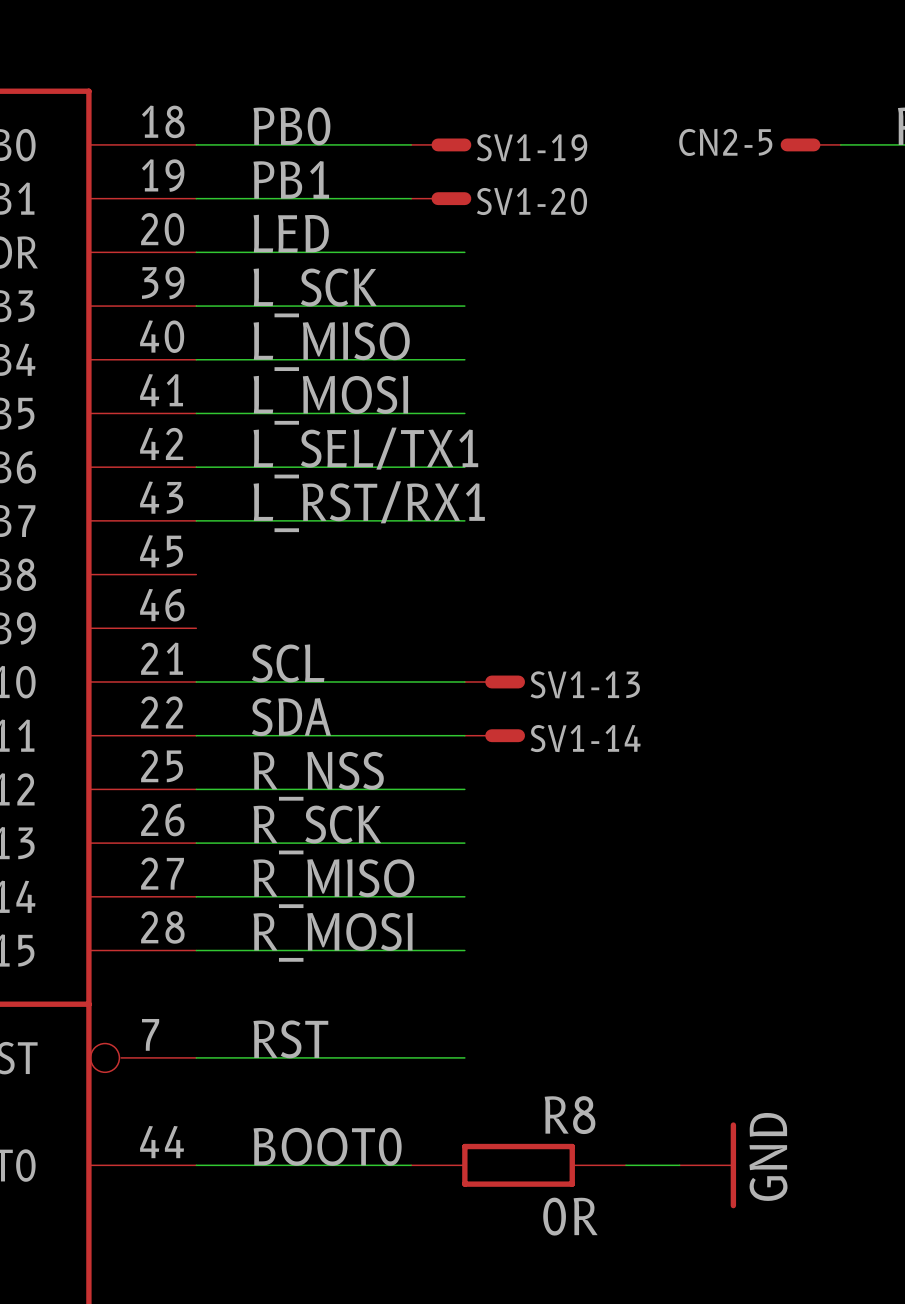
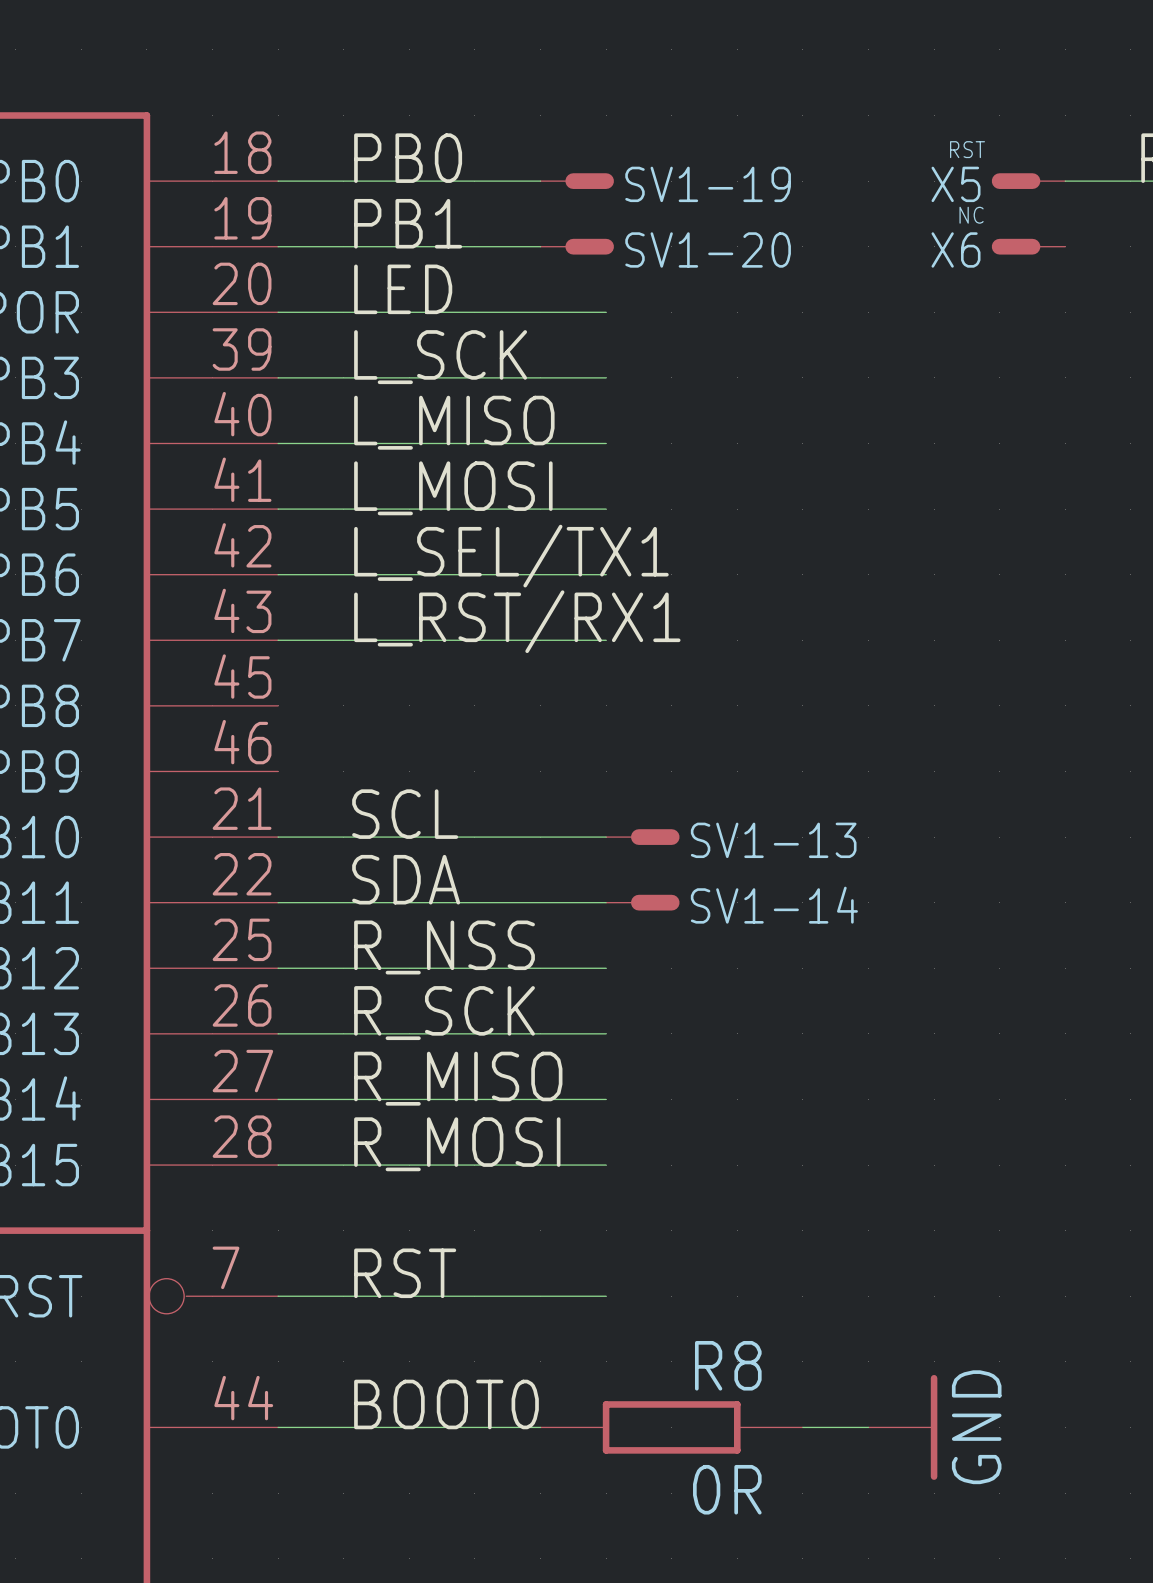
CN2-5 value: none -> RST (967, 149)
CN2-5 name: CN2-5 (725, 142) -> X5 (956, 184)
X6: none -> NC (1028, 246)

